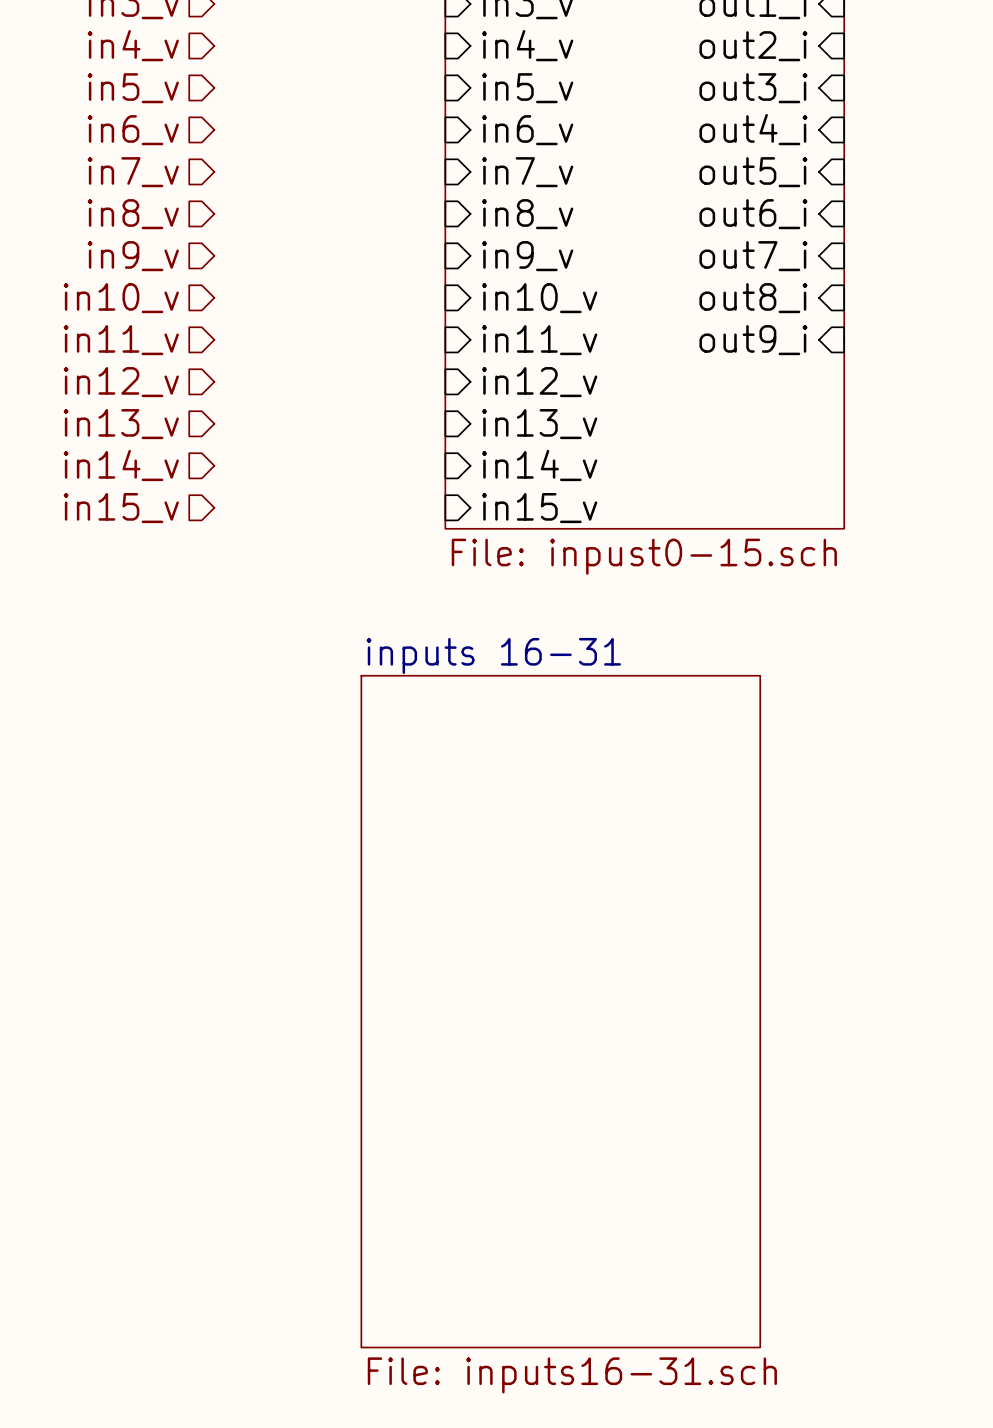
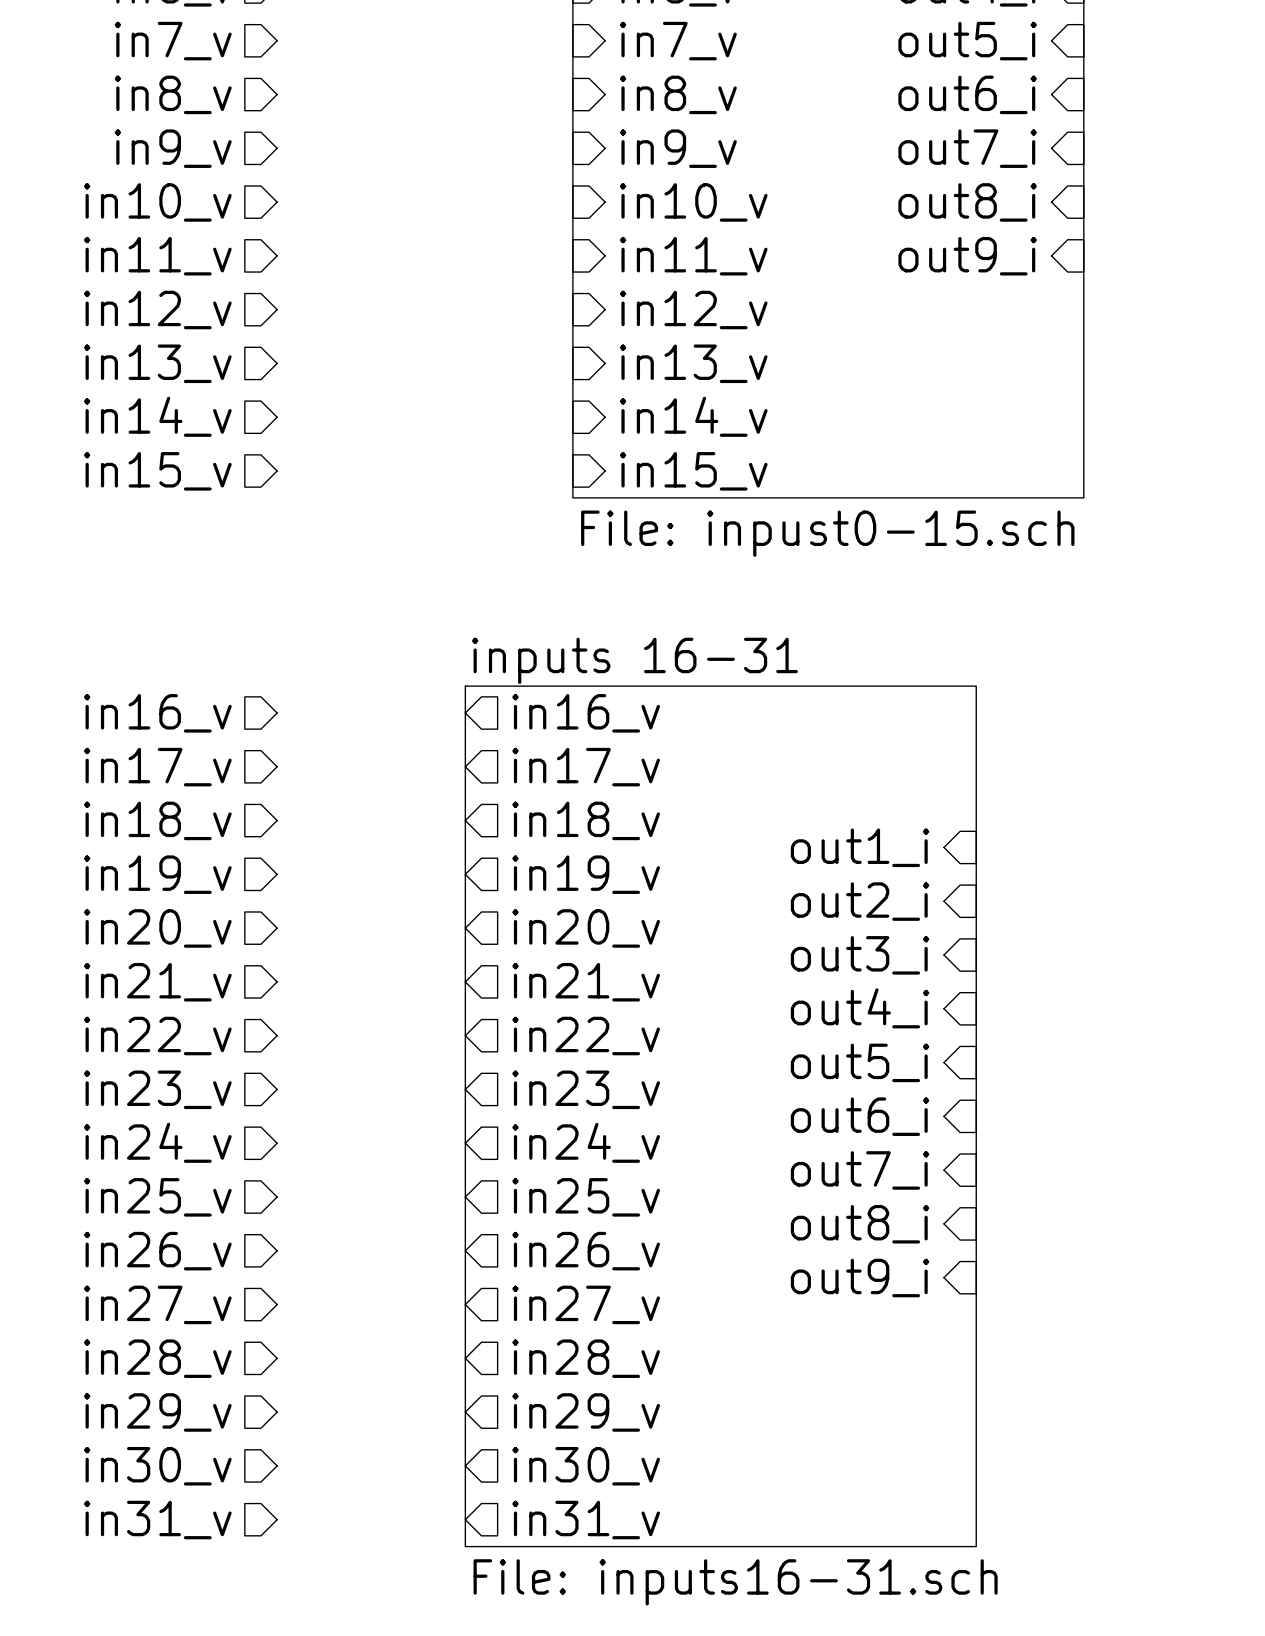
hierarchical label: none -> in16_v (157, 713)
hierarchical label: none -> in16_v (586, 713)
hierarchical label: none -> in17_v (157, 767)
hierarchical label: none -> in17_v (586, 767)
hierarchical label: none -> in18_v (157, 820)
hierarchical label: none -> in18_v (586, 820)
hierarchical label: none -> out1_i (860, 847)
hierarchical label: none -> in19_v (157, 874)
hierarchical label: none -> in19_v (586, 874)
hierarchical label: none -> out2_i (860, 901)
hierarchical label: none -> in20_v (157, 928)
hierarchical label: none -> in20_v (586, 928)
hierarchical label: none -> out3_i (860, 955)
hierarchical label: none -> in21_v (157, 982)
hierarchical label: none -> in21_v (586, 982)
hierarchical label: none -> out4_i (860, 1008)
hierarchical label: none -> in22_v (157, 1036)
hierarchical label: none -> in22_v (586, 1036)
hierarchical label: none -> out5_i (860, 1062)
hierarchical label: none -> in23_v (157, 1089)
hierarchical label: none -> in23_v (586, 1089)
hierarchical label: none -> out6_i (860, 1116)
hierarchical label: none -> in24_v (157, 1142)
hierarchical label: none -> in24_v (586, 1142)
hierarchical label: none -> out7_i (860, 1170)
hierarchical label: none -> in25_v (157, 1197)
hierarchical label: none -> in25_v (586, 1197)
hierarchical label: none -> out8_i (860, 1224)
hierarchical label: none -> in26_v (157, 1251)
hierarchical label: none -> in26_v (586, 1251)
hierarchical label: none -> out9_i (860, 1278)
hierarchical label: none -> in27_v (157, 1304)
hierarchical label: none -> in27_v (586, 1304)
hierarchical label: none -> in28_v (157, 1358)
hierarchical label: none -> in28_v (586, 1358)
hierarchical label: none -> in29_v (157, 1412)
hierarchical label: none -> in29_v (586, 1412)
hierarchical label: none -> in30_v (157, 1466)
hierarchical label: none -> in30_v (586, 1466)
hierarchical label: none -> in31_v (157, 1520)
hierarchical label: none -> in31_v (586, 1520)

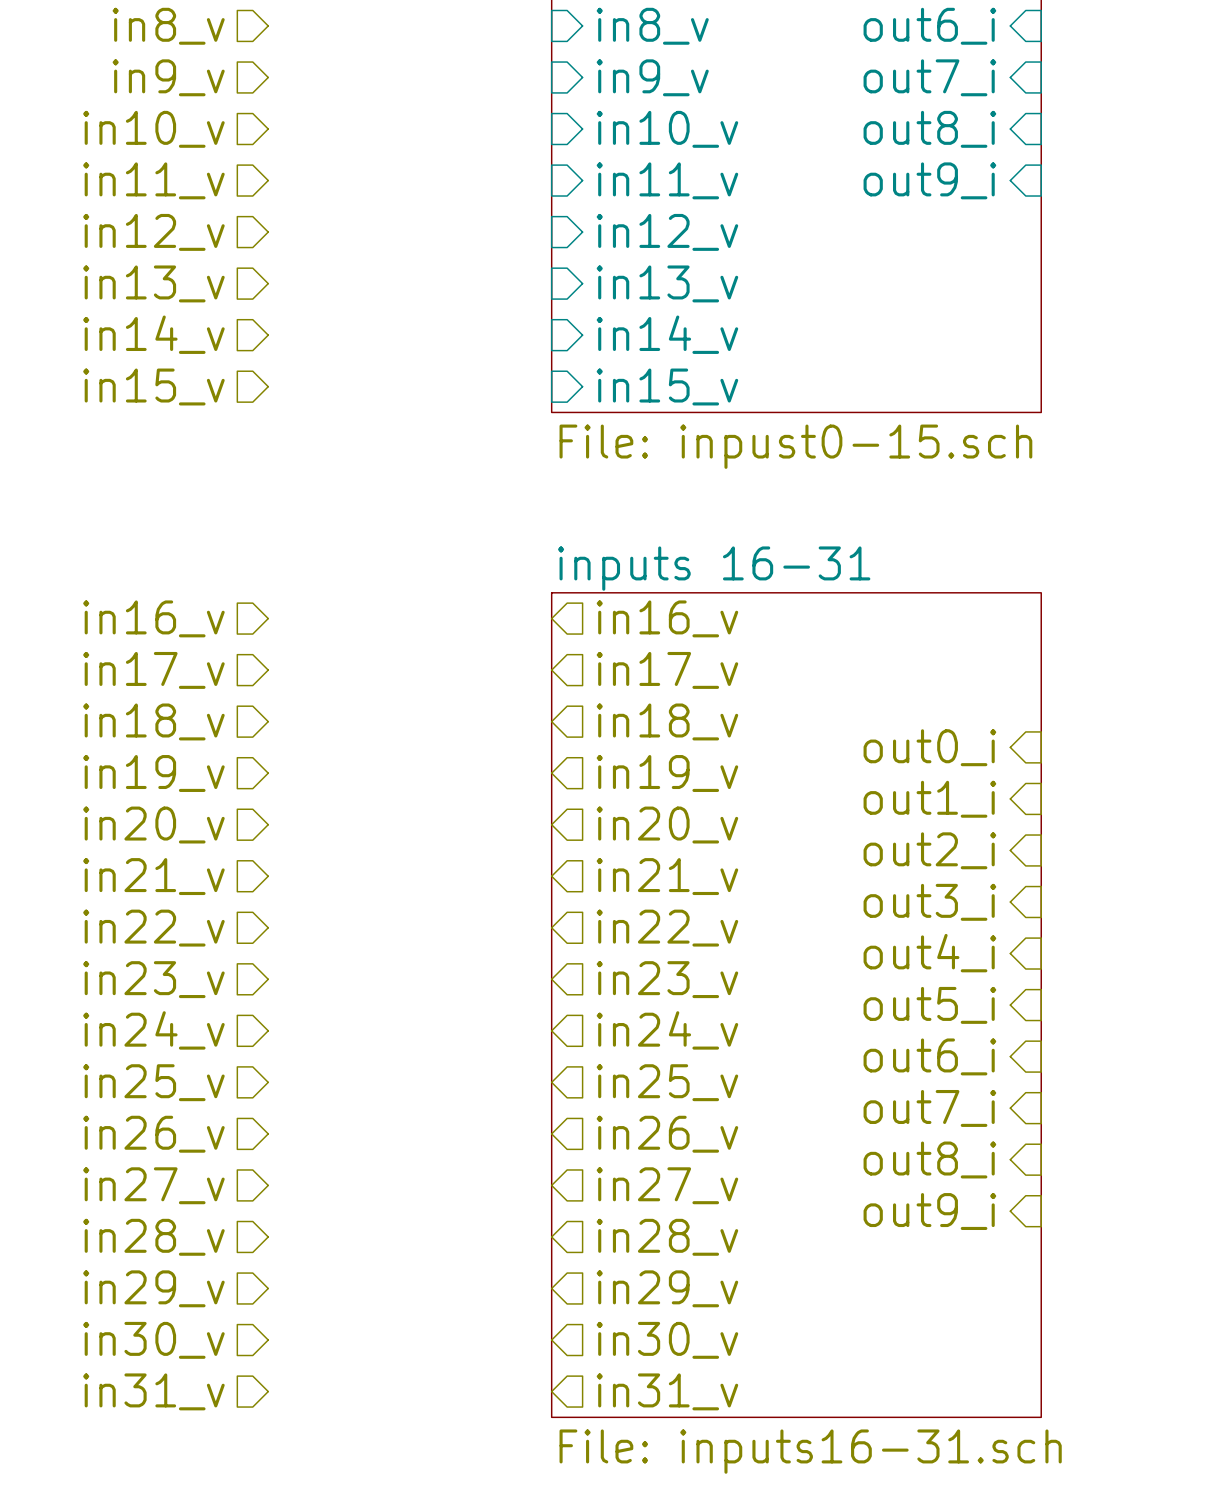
hierarchical label position: in16_v (586, 713) -> in16_v (667, 618)
hierarchical label position: in17_v (586, 767) -> in17_v (667, 670)
hierarchical label position: in18_v (586, 820) -> in18_v (667, 721)
hierarchical label position: out1_i (860, 847) -> out1_i (929, 799)
hierarchical label: none -> out0_i (929, 747)
hierarchical label position: in19_v (586, 874) -> in19_v (667, 773)
hierarchical label position: out2_i (860, 901) -> out2_i (929, 850)
hierarchical label position: in20_v (586, 928) -> in20_v (667, 825)
hierarchical label position: out3_i (860, 955) -> out3_i (929, 902)
hierarchical label position: in21_v (586, 982) -> in21_v (667, 876)
hierarchical label position: out4_i (860, 1008) -> out4_i (929, 953)
hierarchical label position: in22_v (586, 1036) -> in22_v (667, 928)
hierarchical label position: out5_i (860, 1062) -> out5_i (929, 1005)
hierarchical label position: in23_v (586, 1089) -> in23_v (667, 979)
sheet inputs 16-31 position: (720, 1116) -> (796, 1005)
hierarchical label position: out6_i (860, 1116) -> out6_i (929, 1056)
hierarchical label position: in24_v (586, 1142) -> in24_v (667, 1030)
hierarchical label position: out7_i (860, 1170) -> out7_i (929, 1108)
hierarchical label position: in25_v (586, 1197) -> in25_v (667, 1082)
hierarchical label position: out8_i (860, 1224) -> out8_i (929, 1159)
hierarchical label position: in26_v (586, 1251) -> in26_v (667, 1134)
hierarchical label position: out9_i (860, 1278) -> out9_i (929, 1211)
hierarchical label position: in27_v (586, 1304) -> in27_v (667, 1185)
hierarchical label position: in28_v (586, 1358) -> in28_v (667, 1237)
hierarchical label position: in29_v (586, 1412) -> in29_v (667, 1288)
hierarchical label position: in30_v (586, 1466) -> in30_v (667, 1340)
hierarchical label position: in31_v (586, 1520) -> in31_v (667, 1391)

